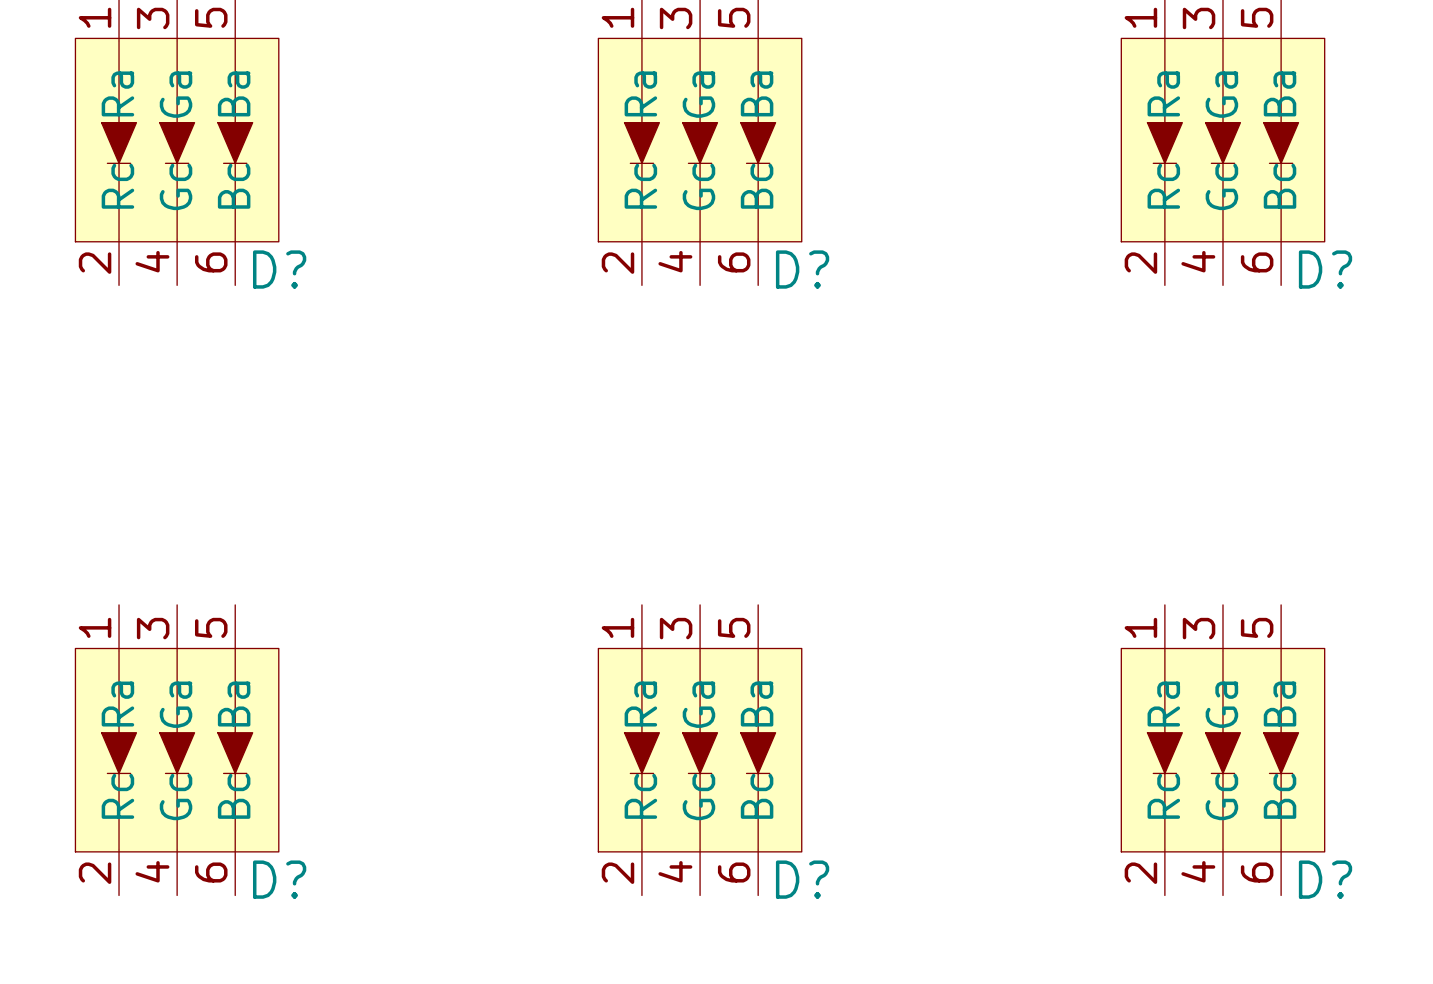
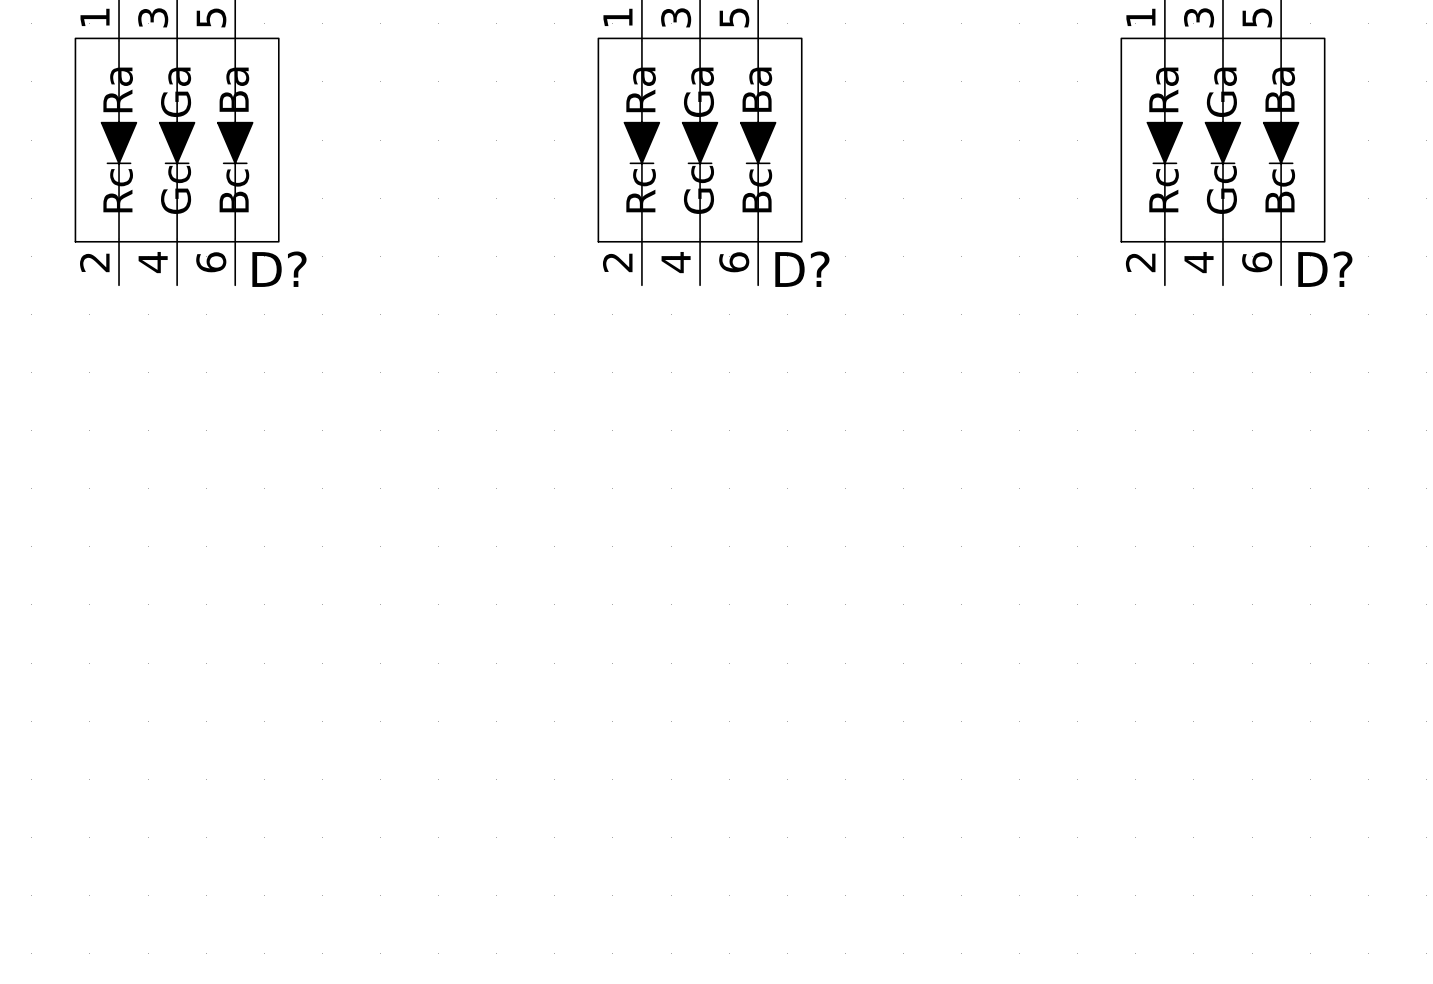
D?: (177, 750) -> none
D?: (700, 750) -> none
D?: (1222, 750) -> none

